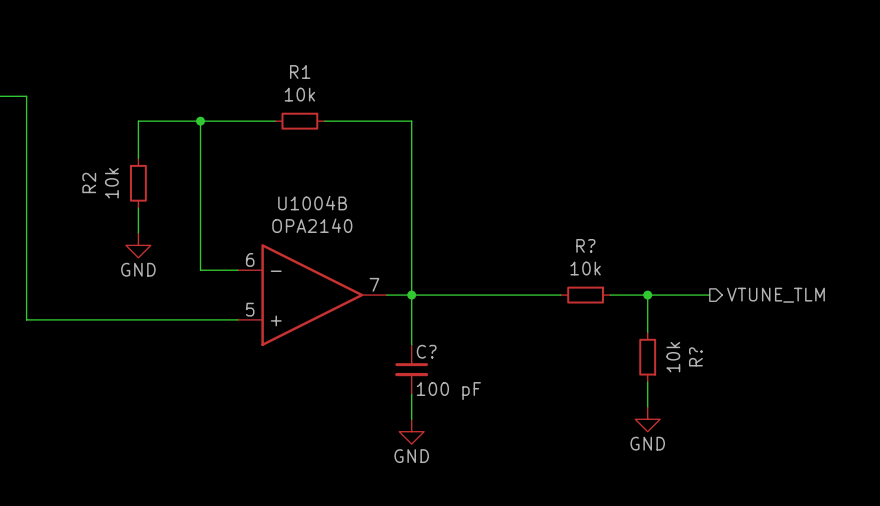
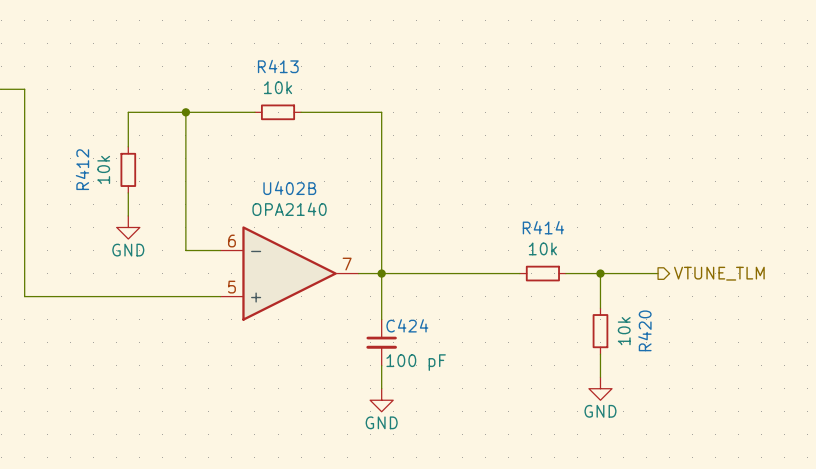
R1 name: R1 (300, 72) -> R413 (278, 66)
R2 name: R2 (89, 182) -> R412 (82, 169)
U1004B name: U1004B (312, 203) -> U402B (289, 188)
R? name: R? (585, 245) -> R414 (543, 227)
C? name: C? (426, 351) -> C424 (407, 325)
R? name: R? (695, 356) -> R420 (644, 330)

